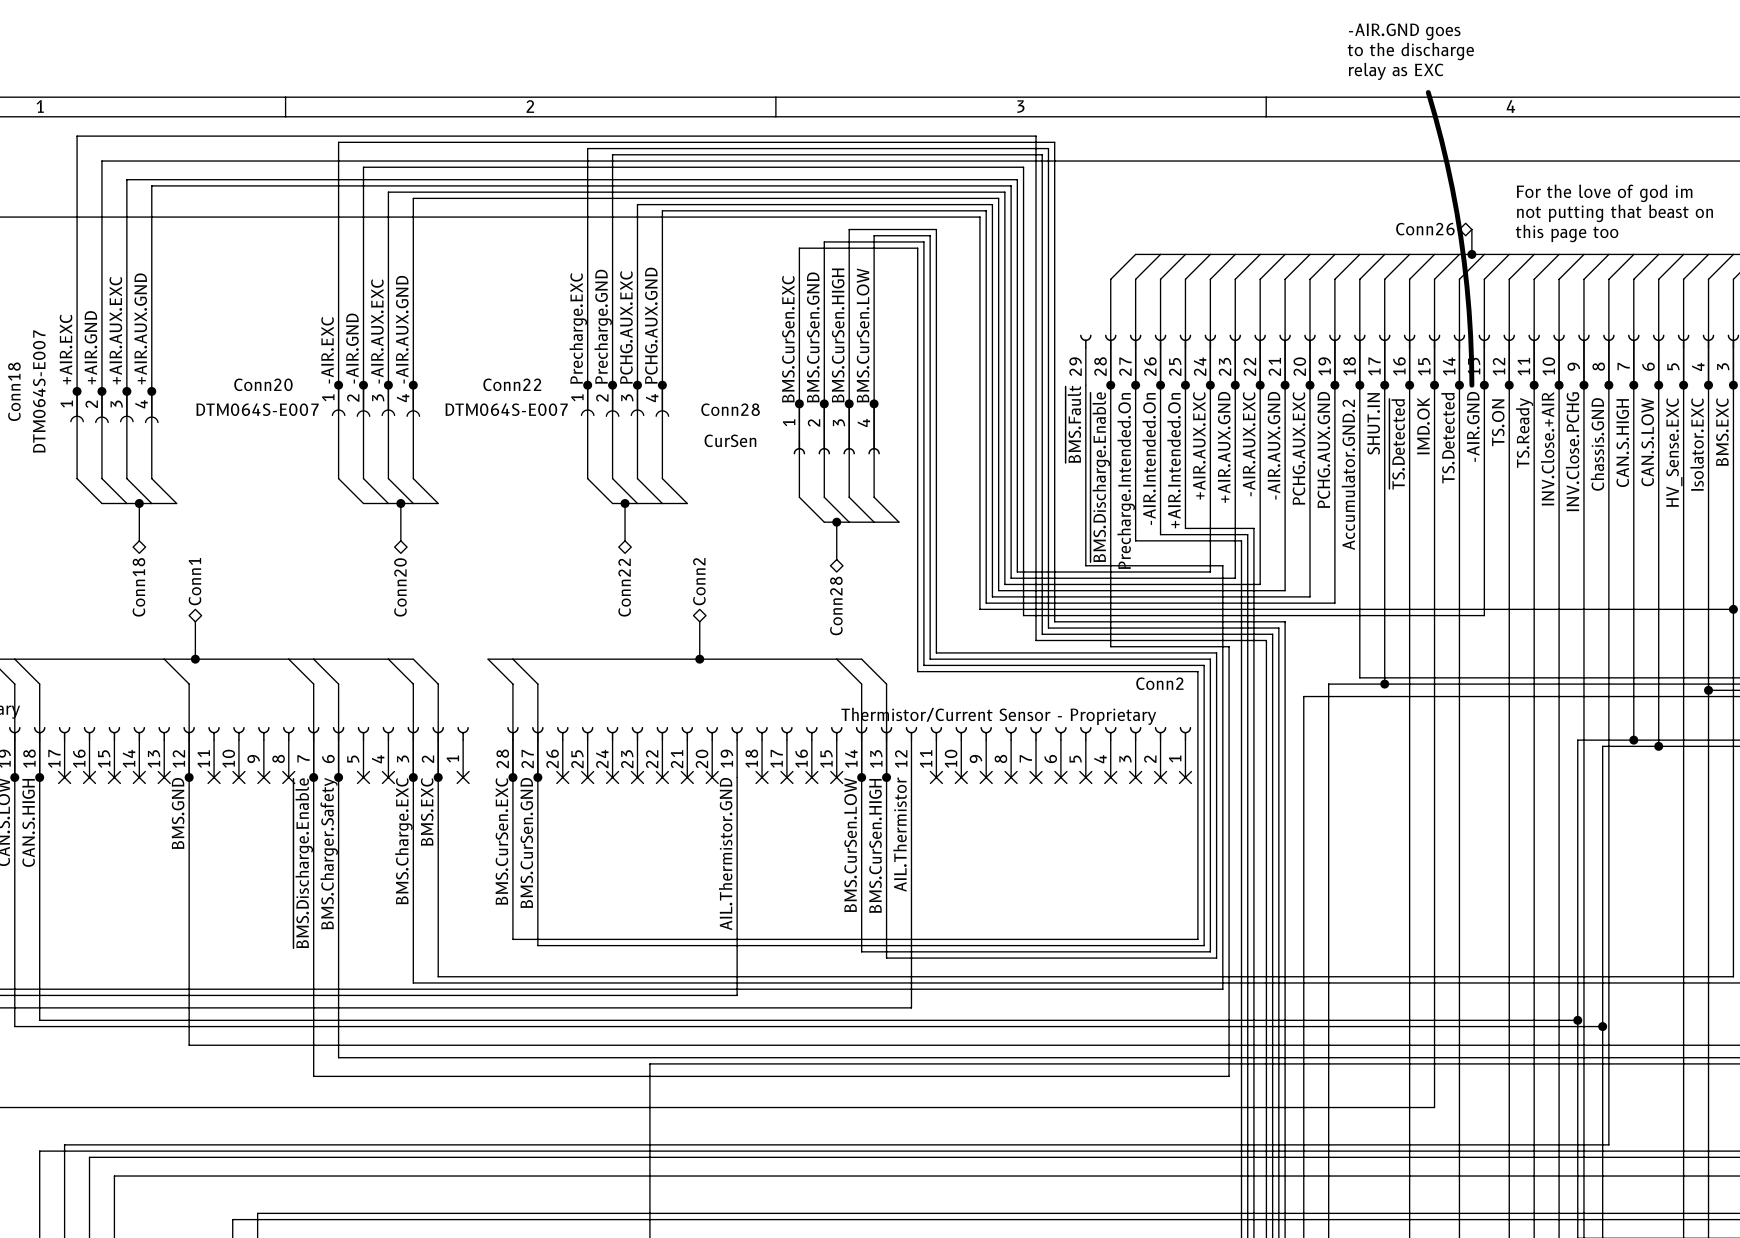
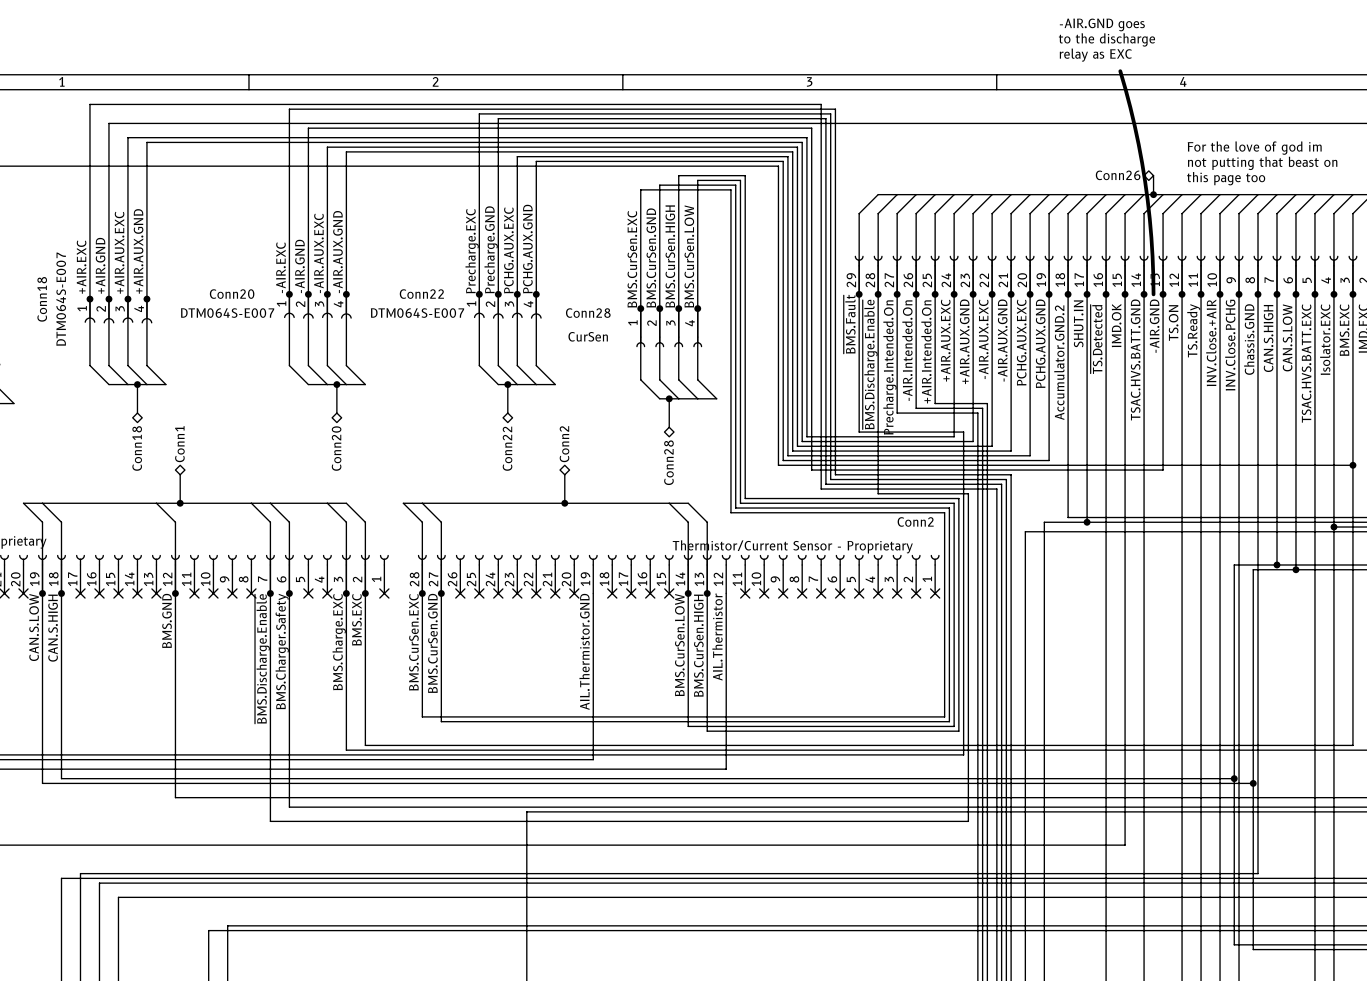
wire: none -> (878, 194) (859, 213) (859, 294)
bus: none -> (878, 194) (897, 194)
junction: none -> (859, 294)
label: TS.Detected (1447, 438) -> TSAC.HVS.BATT.GND (1135, 359)
label: HV_Sense.EXC (1674, 452) -> TSAC.HVS.BATT.EXC (1306, 363)

